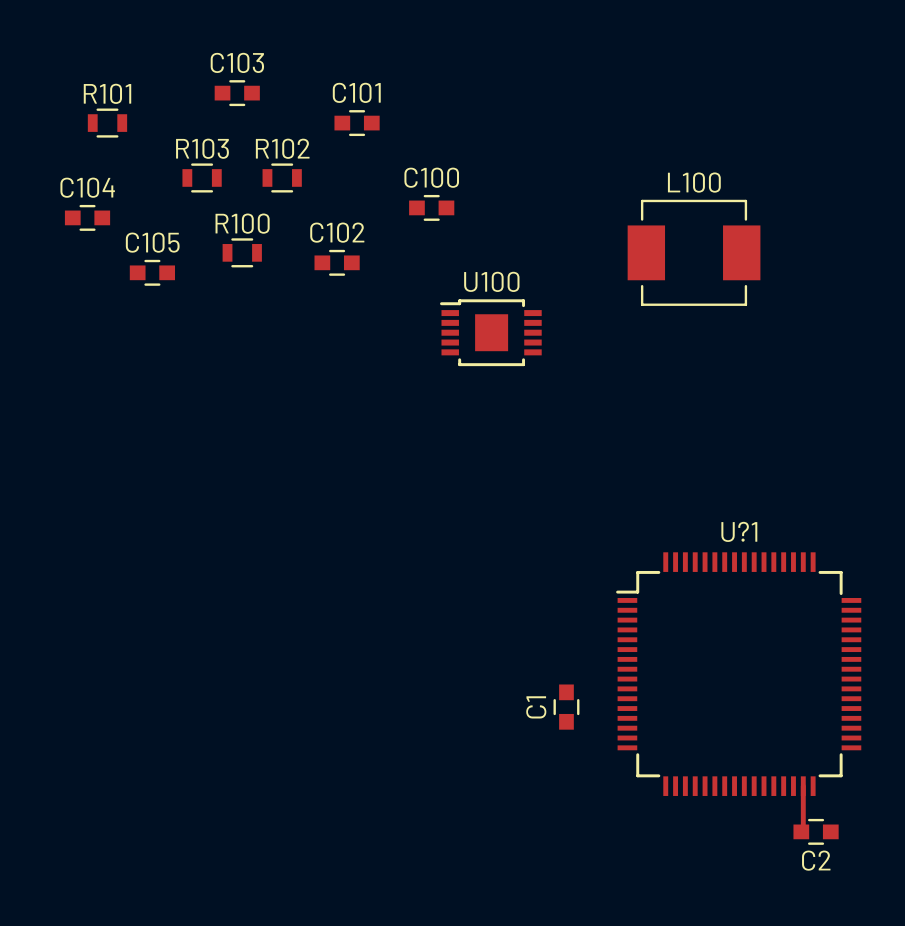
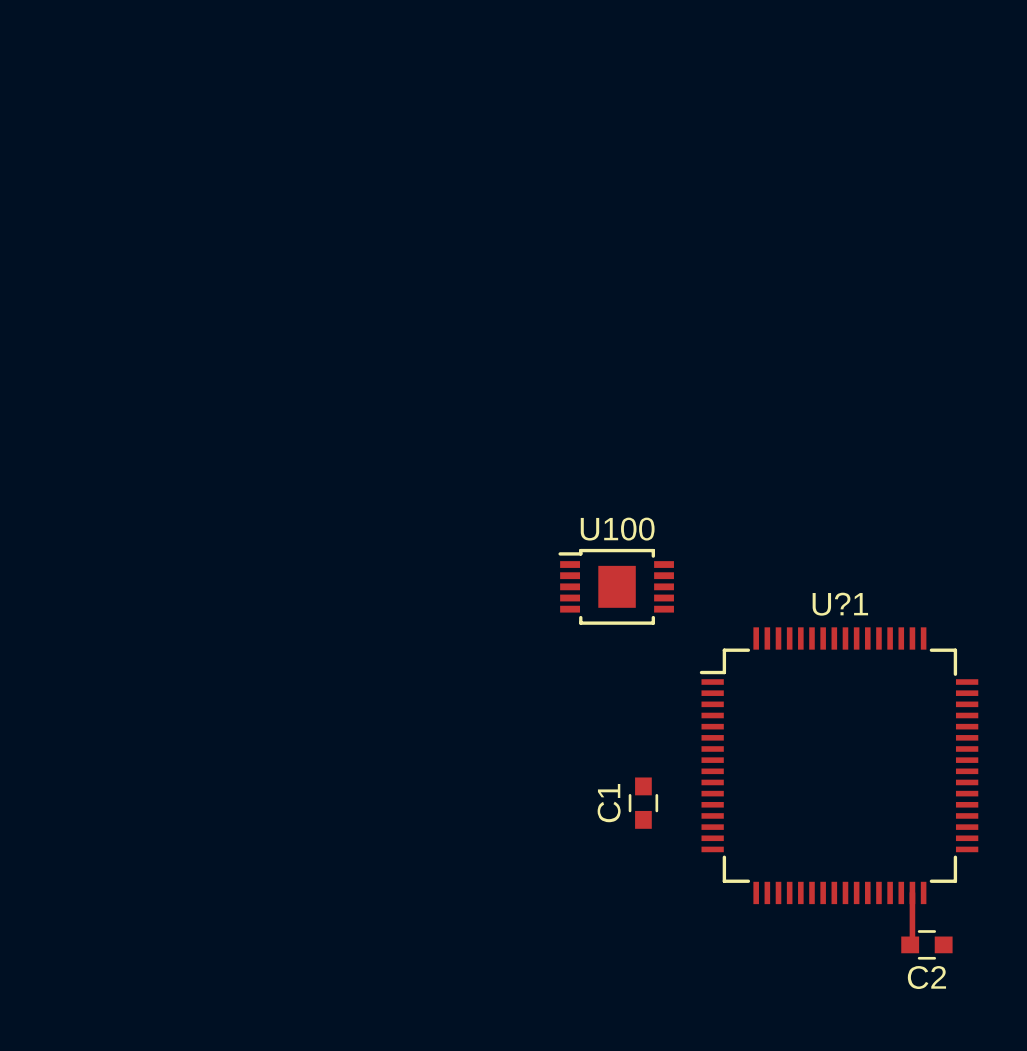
C103: (237, 93) -> none
R101: (107, 123) -> none
C101: (357, 123) -> none
R103: (202, 177) -> none
R102: (282, 177) -> none
C100: (431, 207) -> none
C104: (87, 217) -> none
R100: (242, 252) -> none
L100: (694, 252) -> none
C102: (337, 262) -> none
C105: (152, 272) -> none
U100 position: (490, 332) -> (616, 586)

